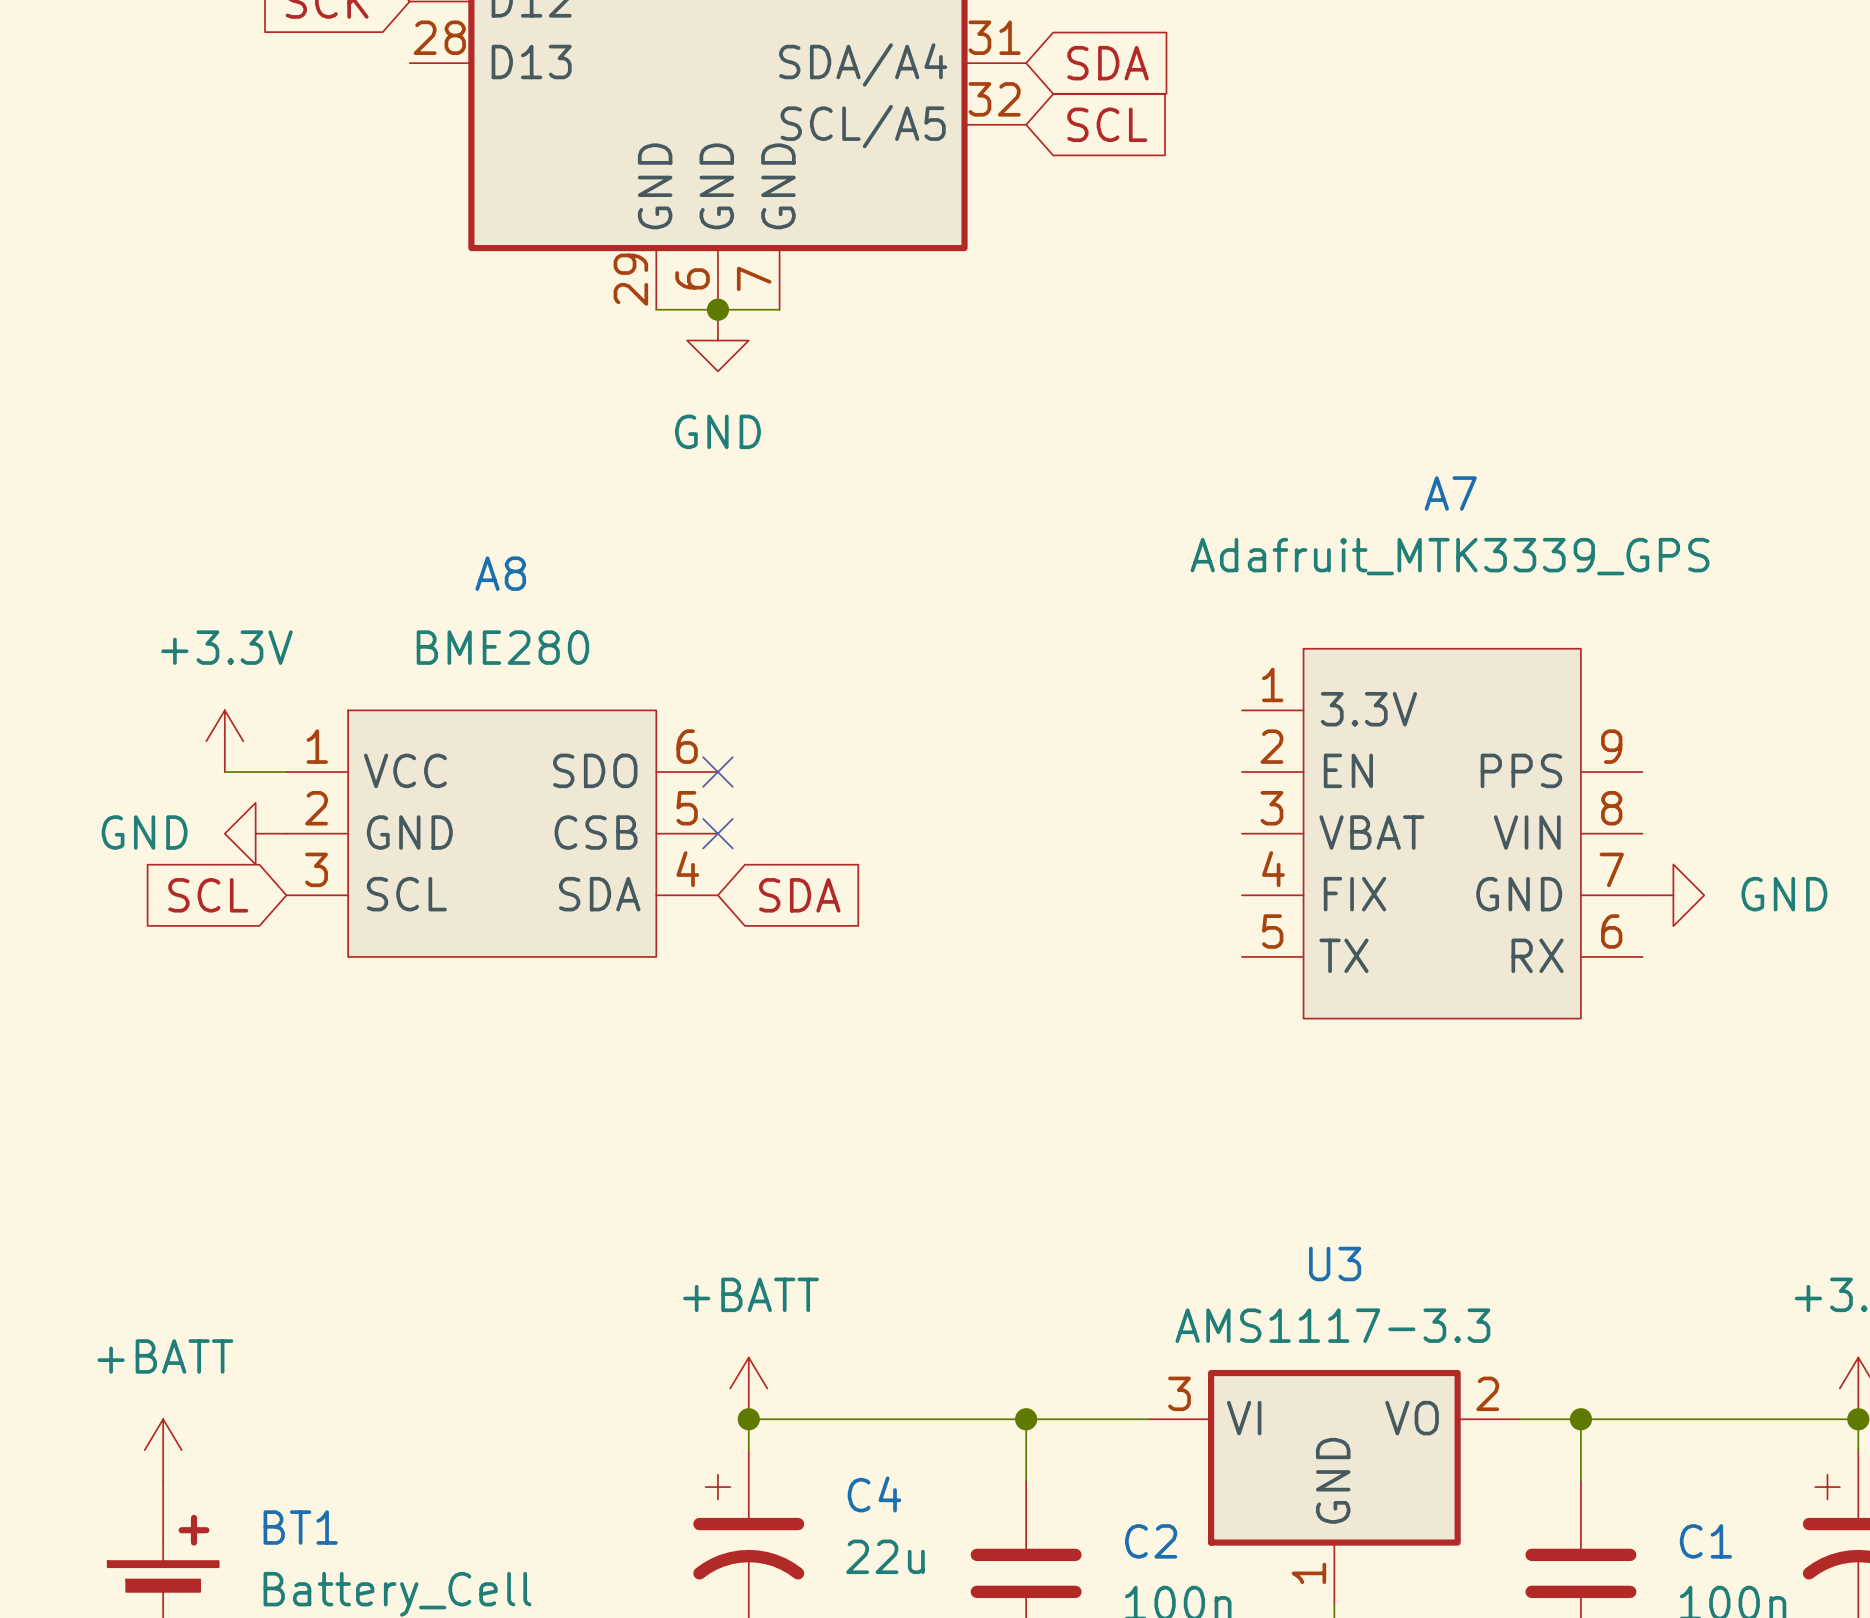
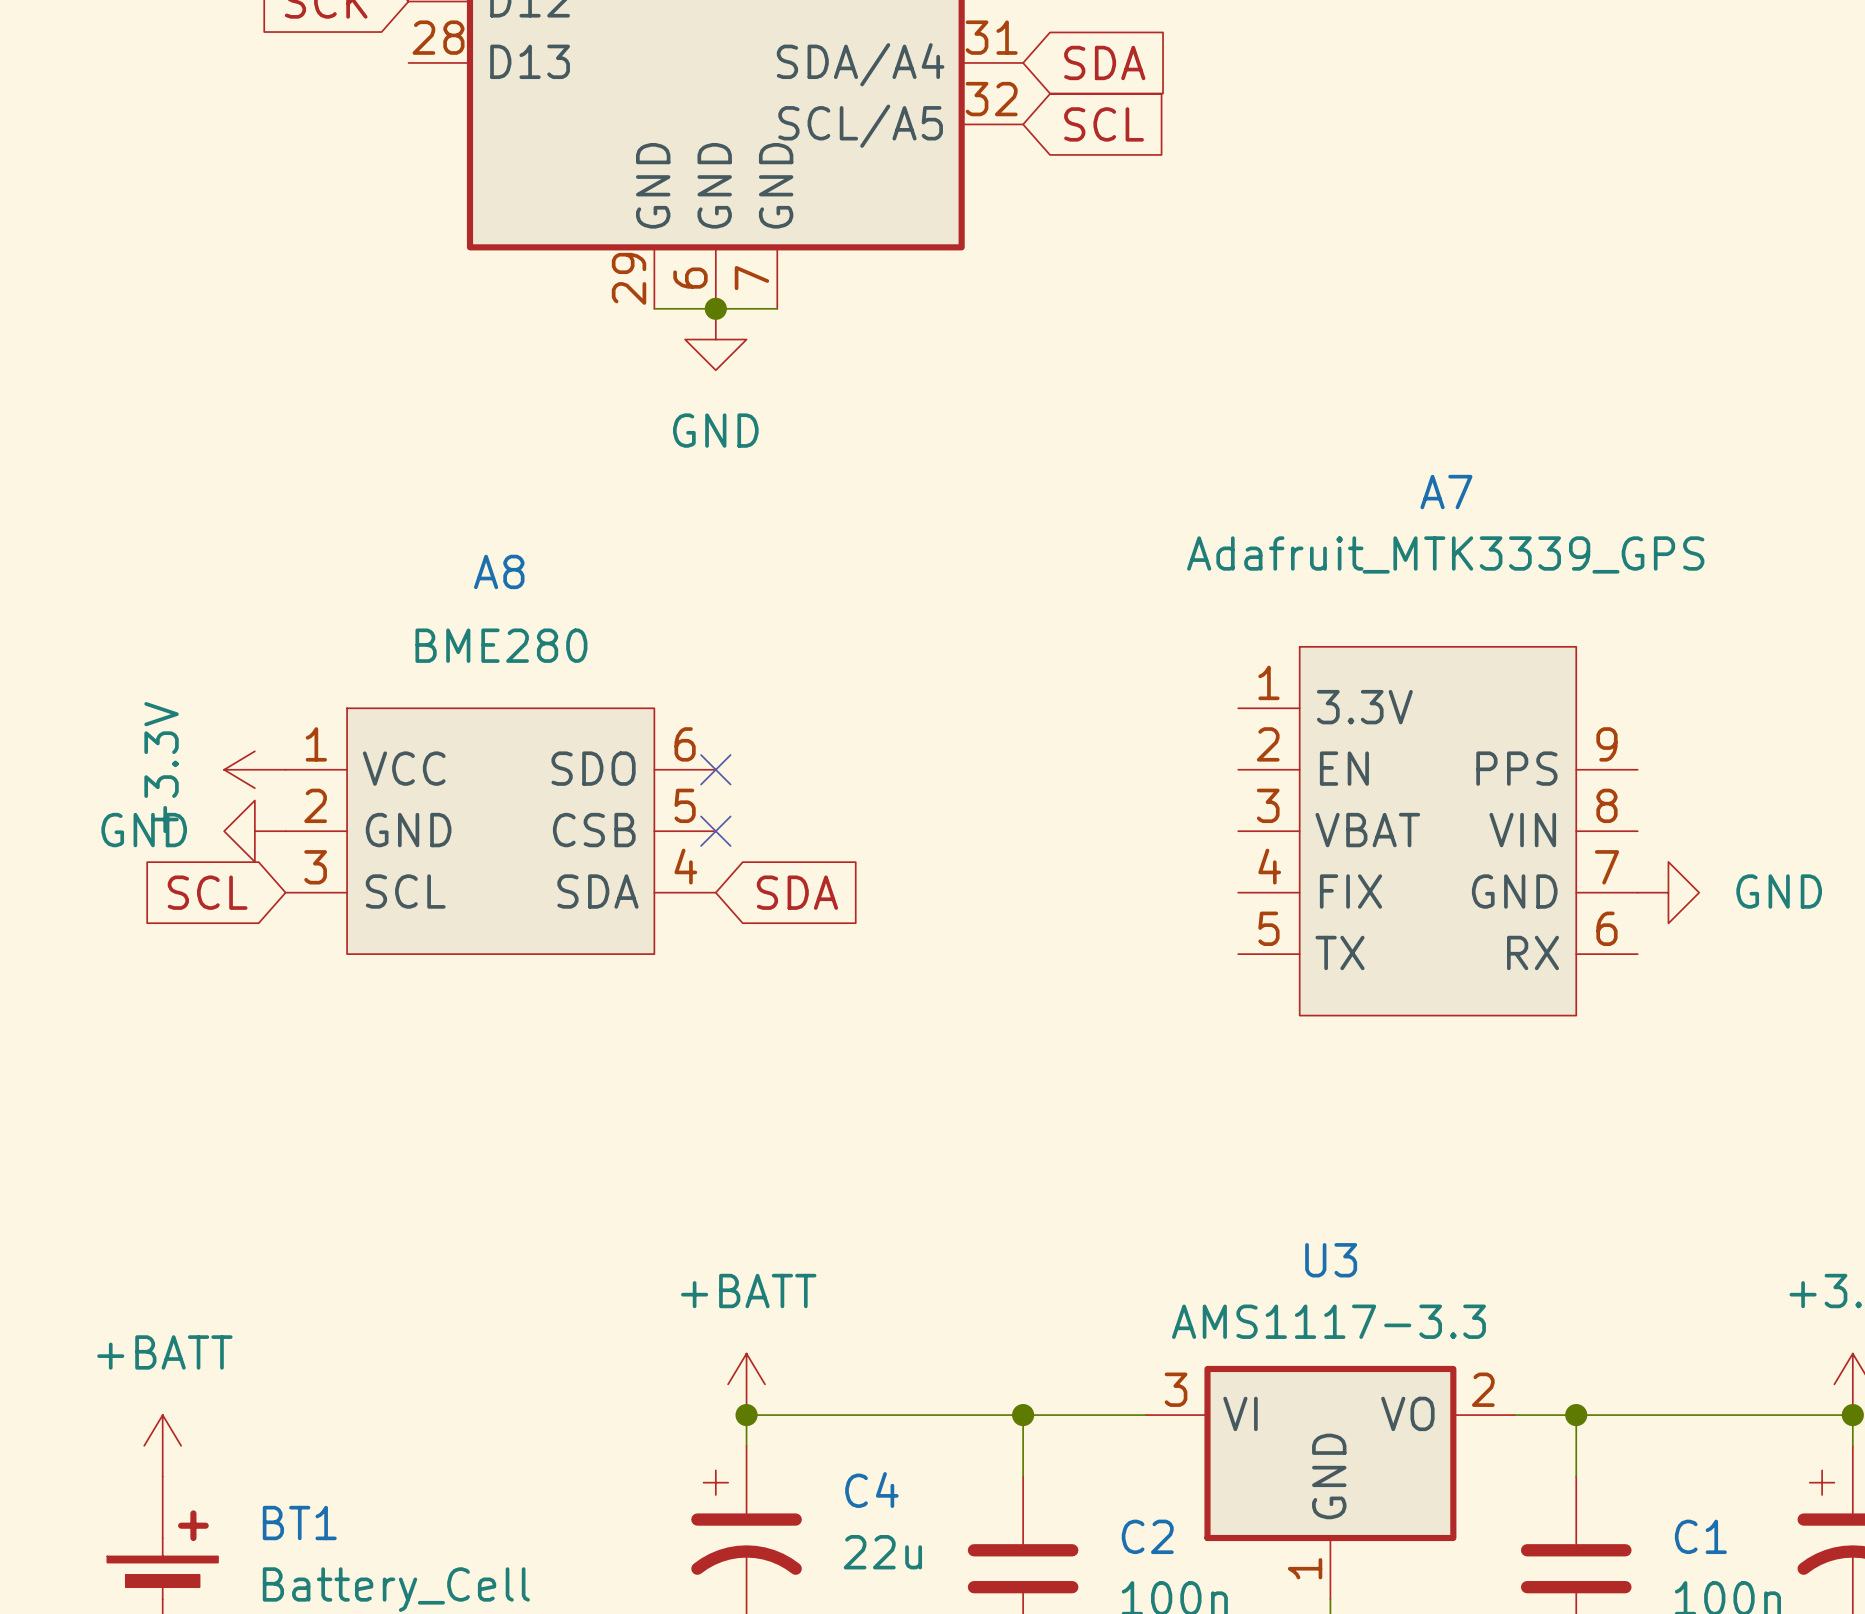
power symbol rotation: 0° (224, 741) -> 90° counterclockwise (254, 769)
power symbol position: +3.3V (224, 741) -> +3.3V (254, 769)

